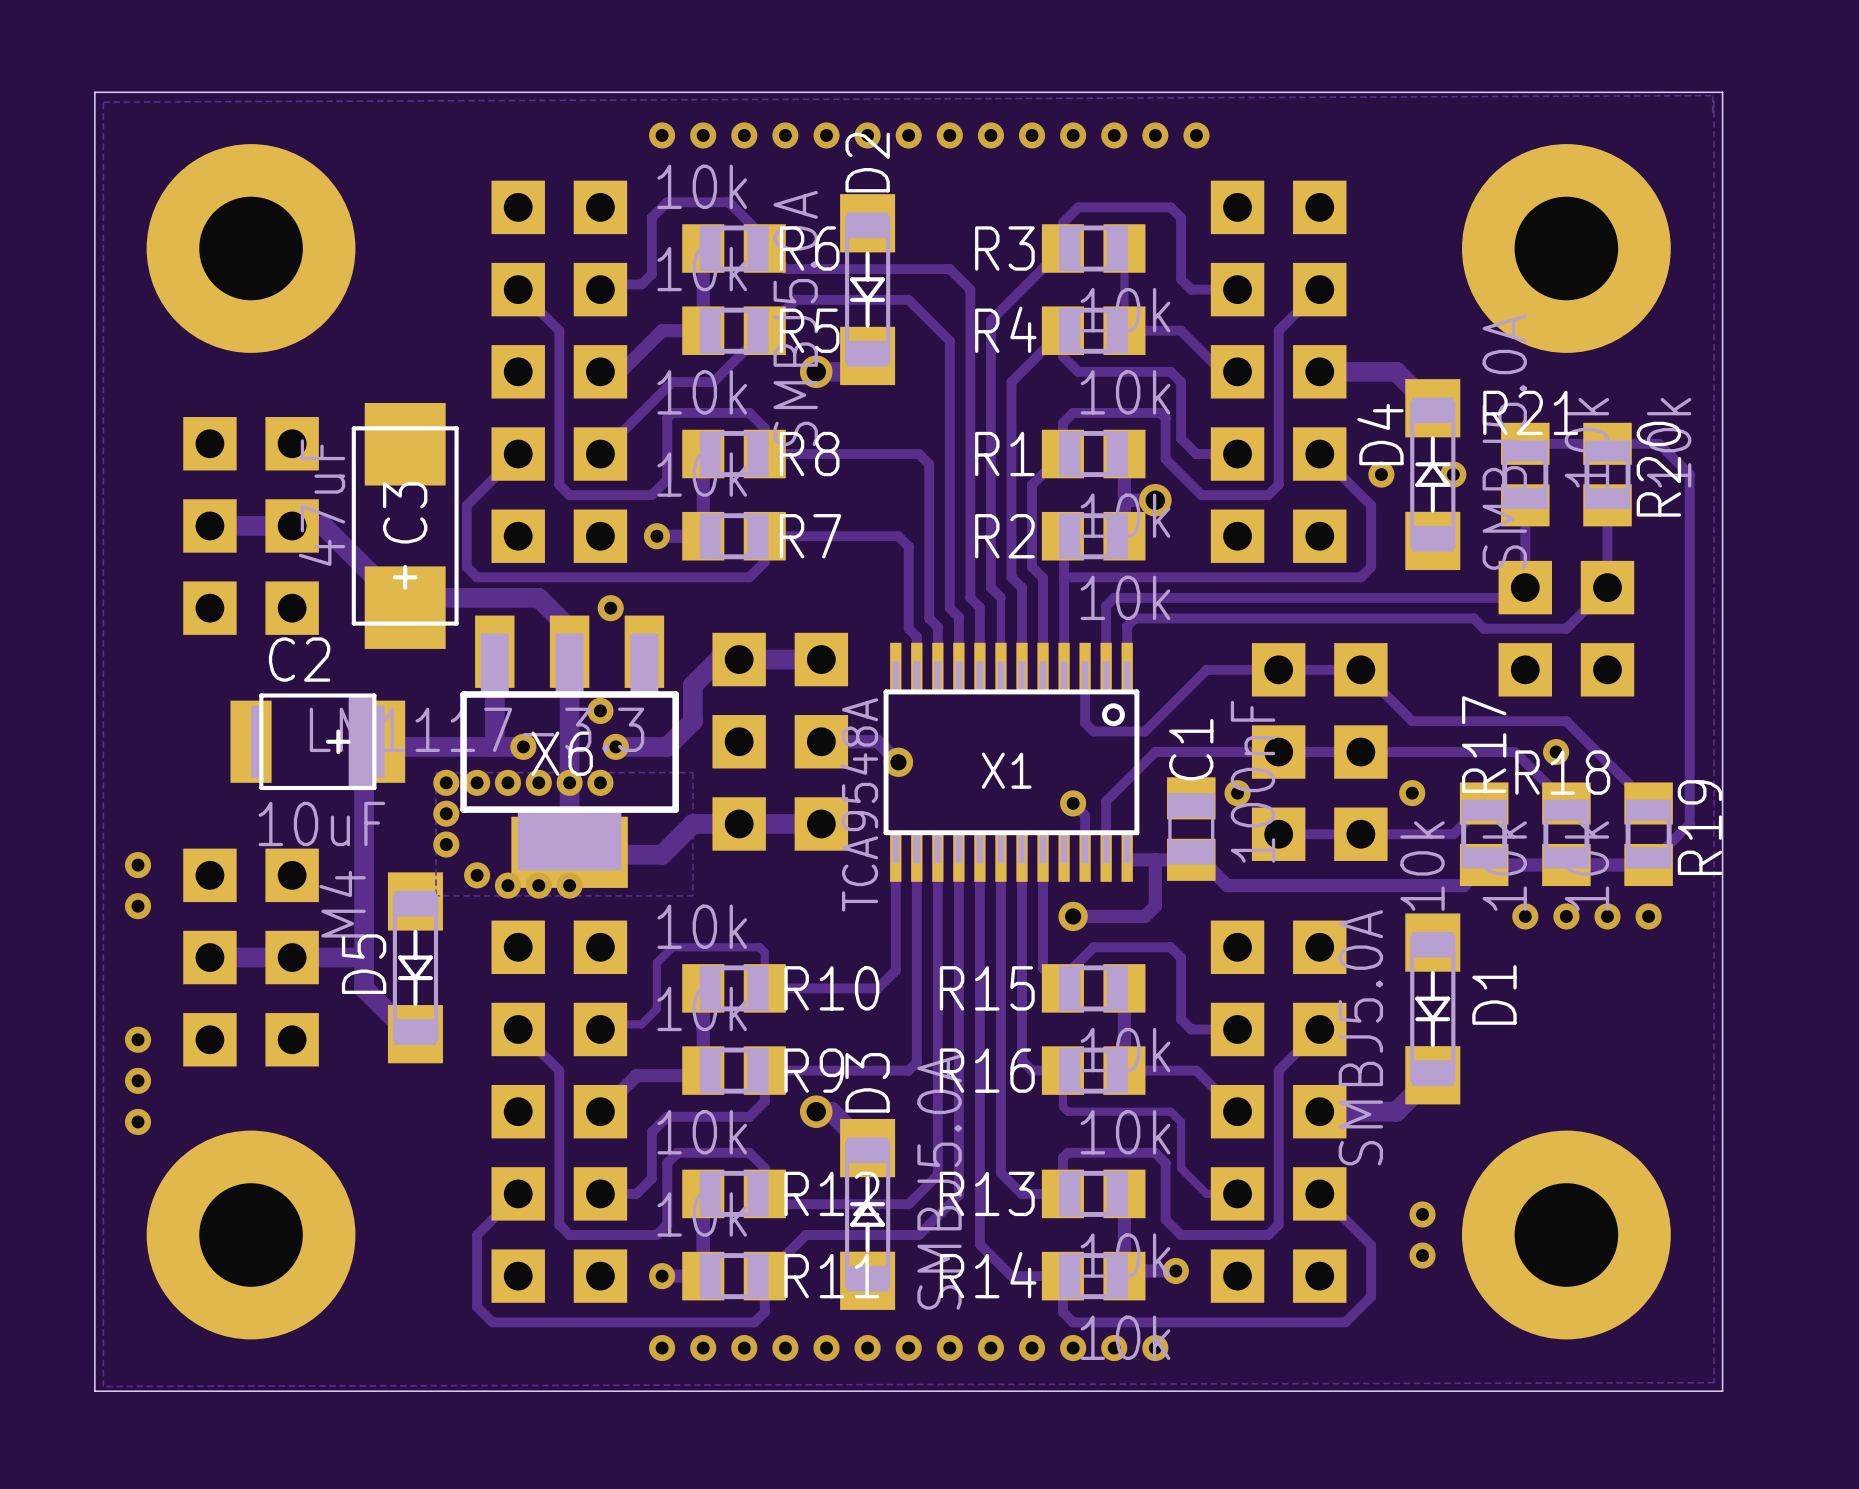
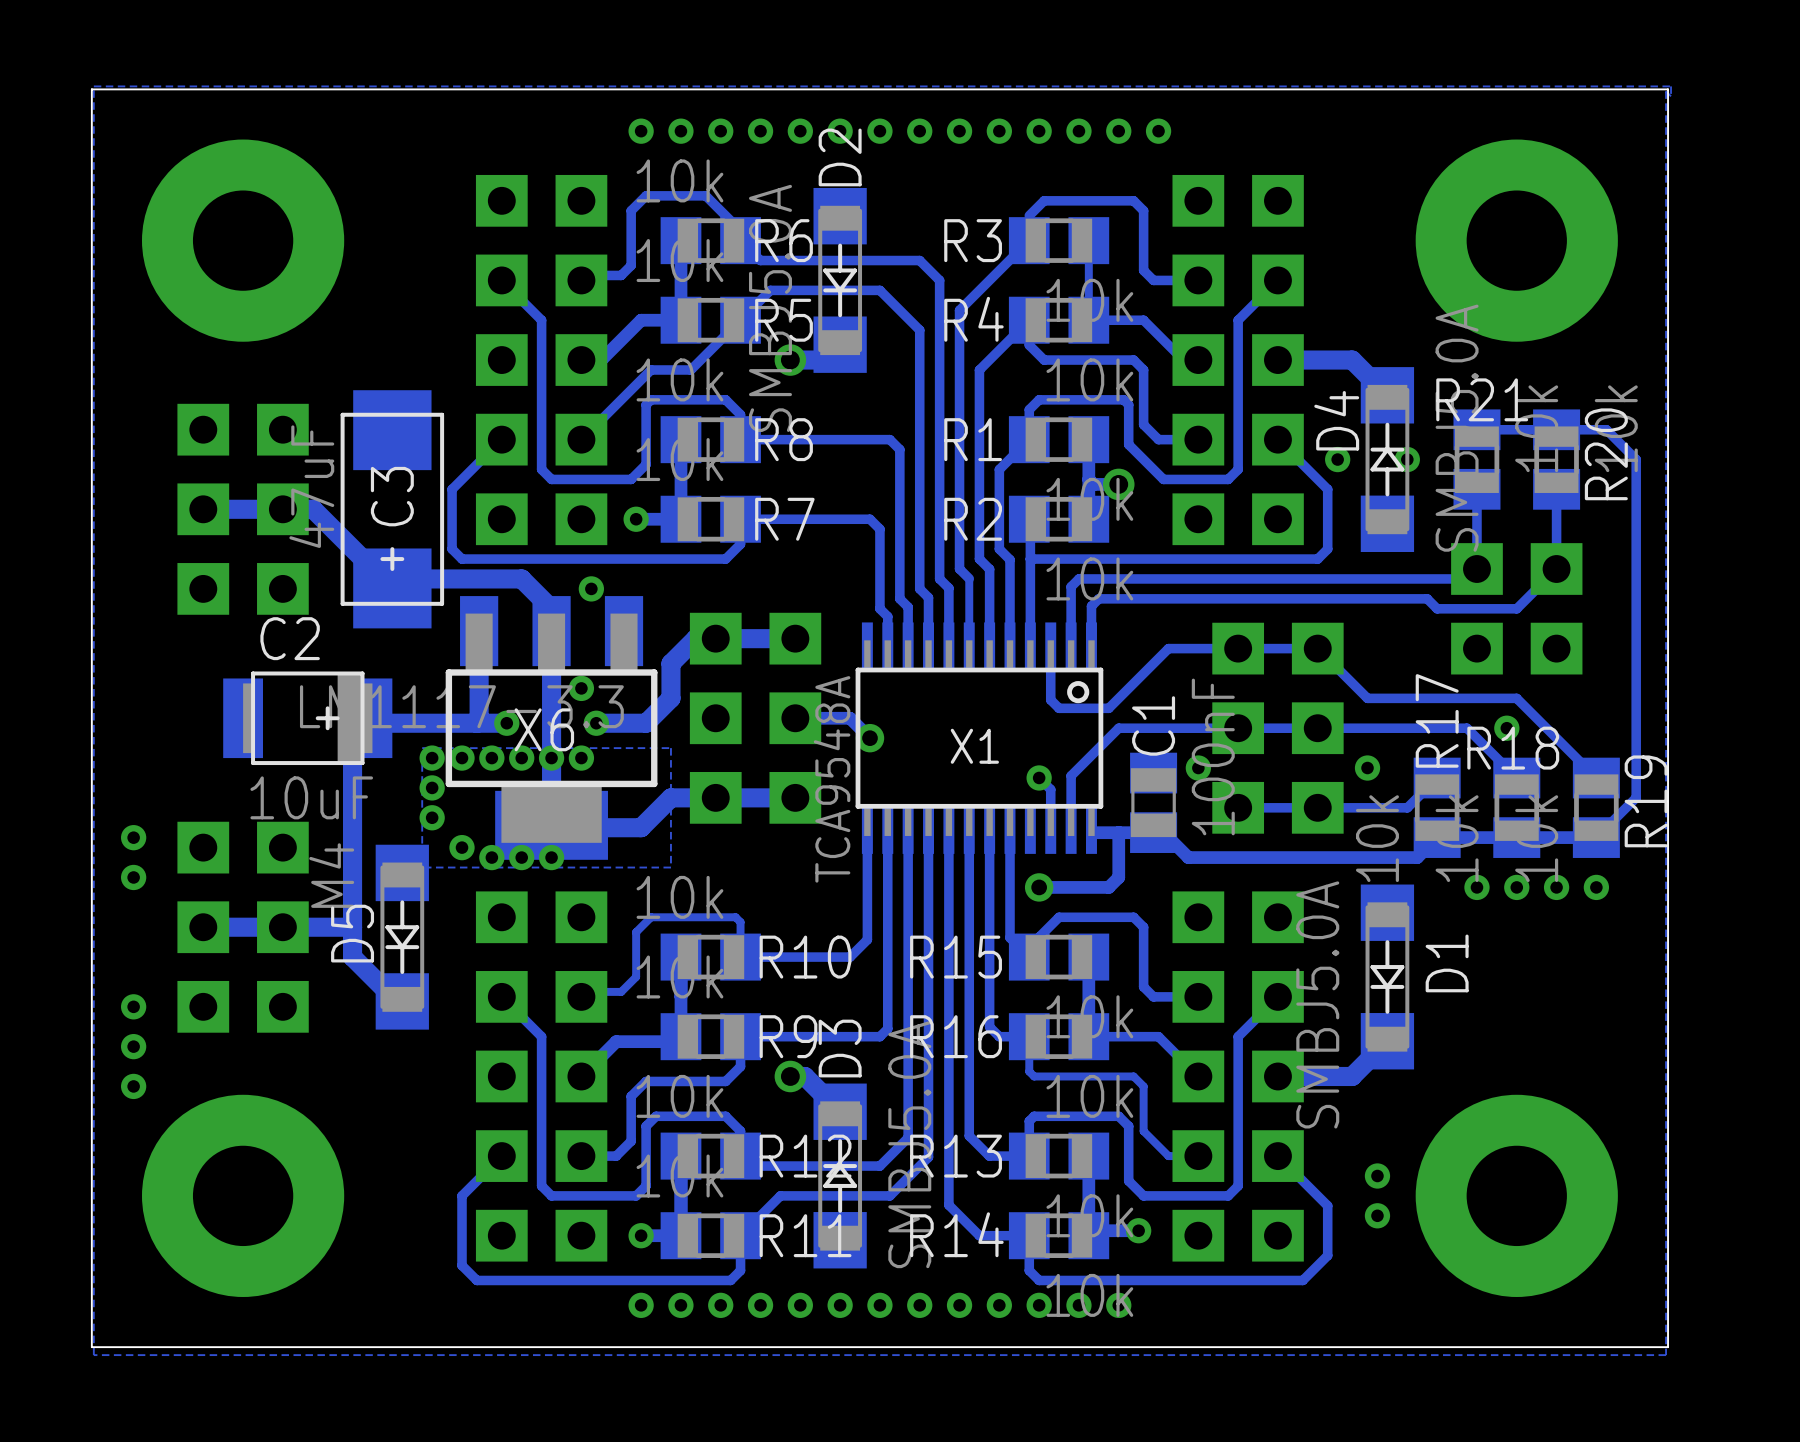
zone outline: (1712, 95) (103, 102) (103, 1386) (1714, 1382) (1712, 95) -> (1671, 86) (1671, 96) (1666, 91) (1666, 1355) (93, 1355) (93, 86) (1671, 86)

